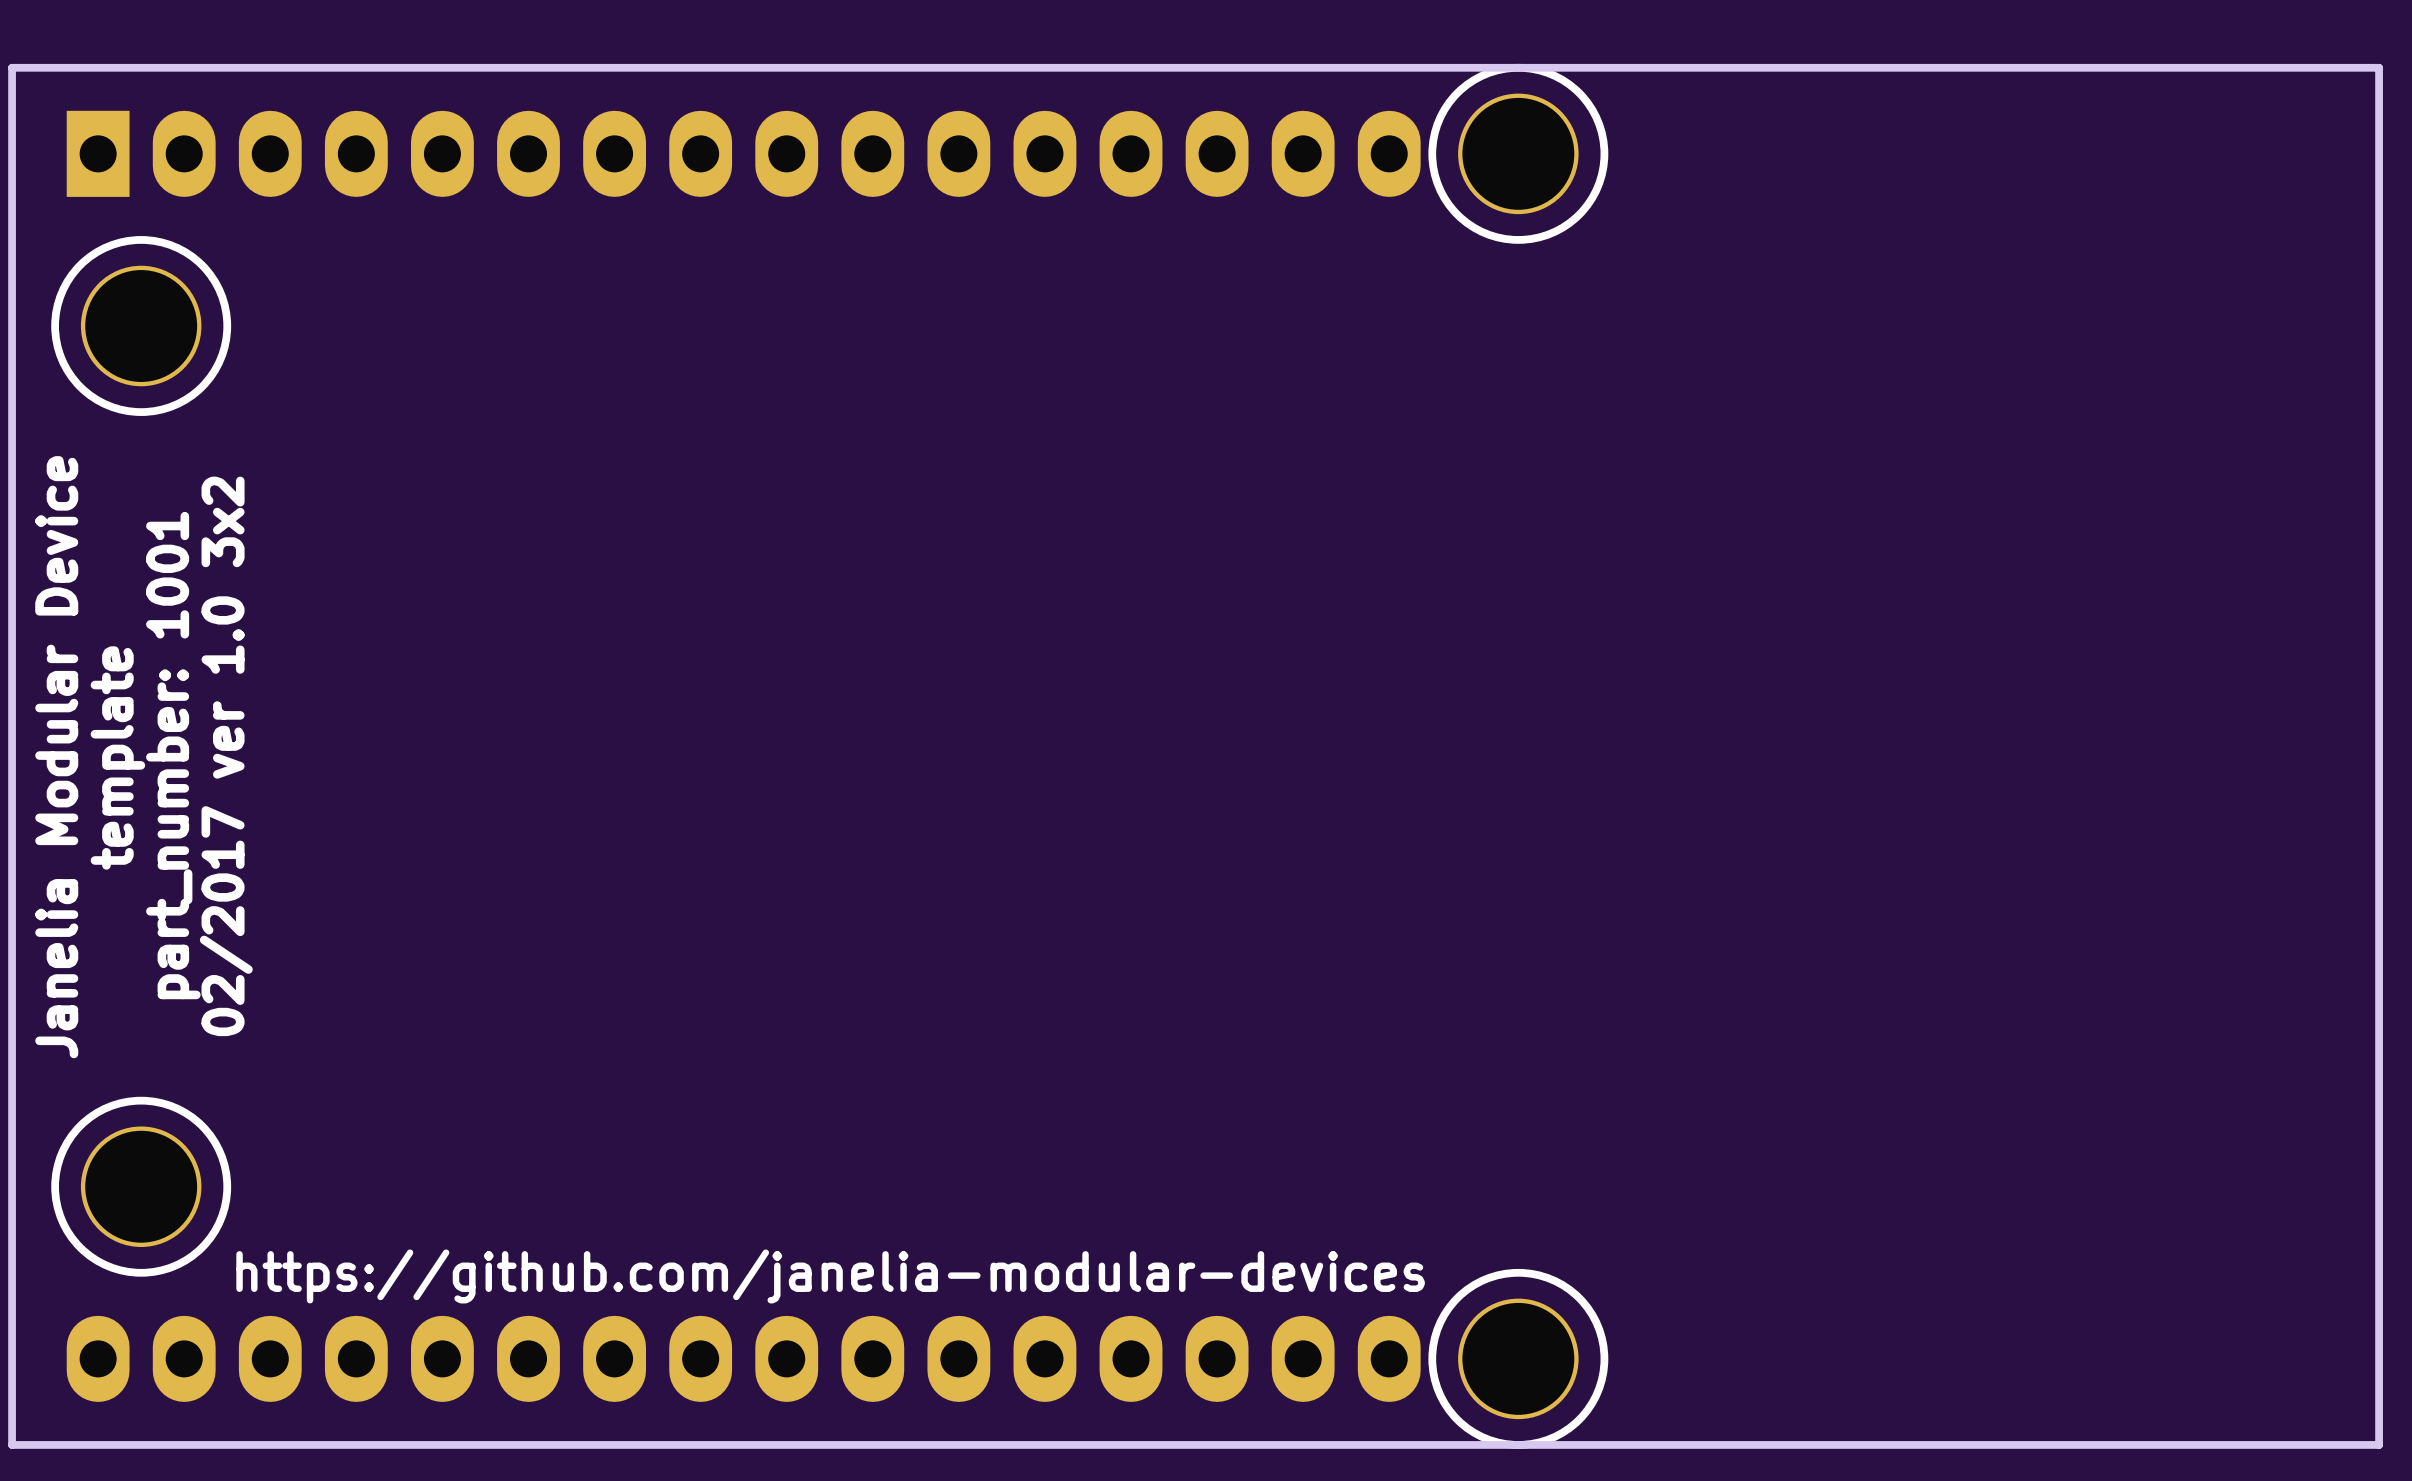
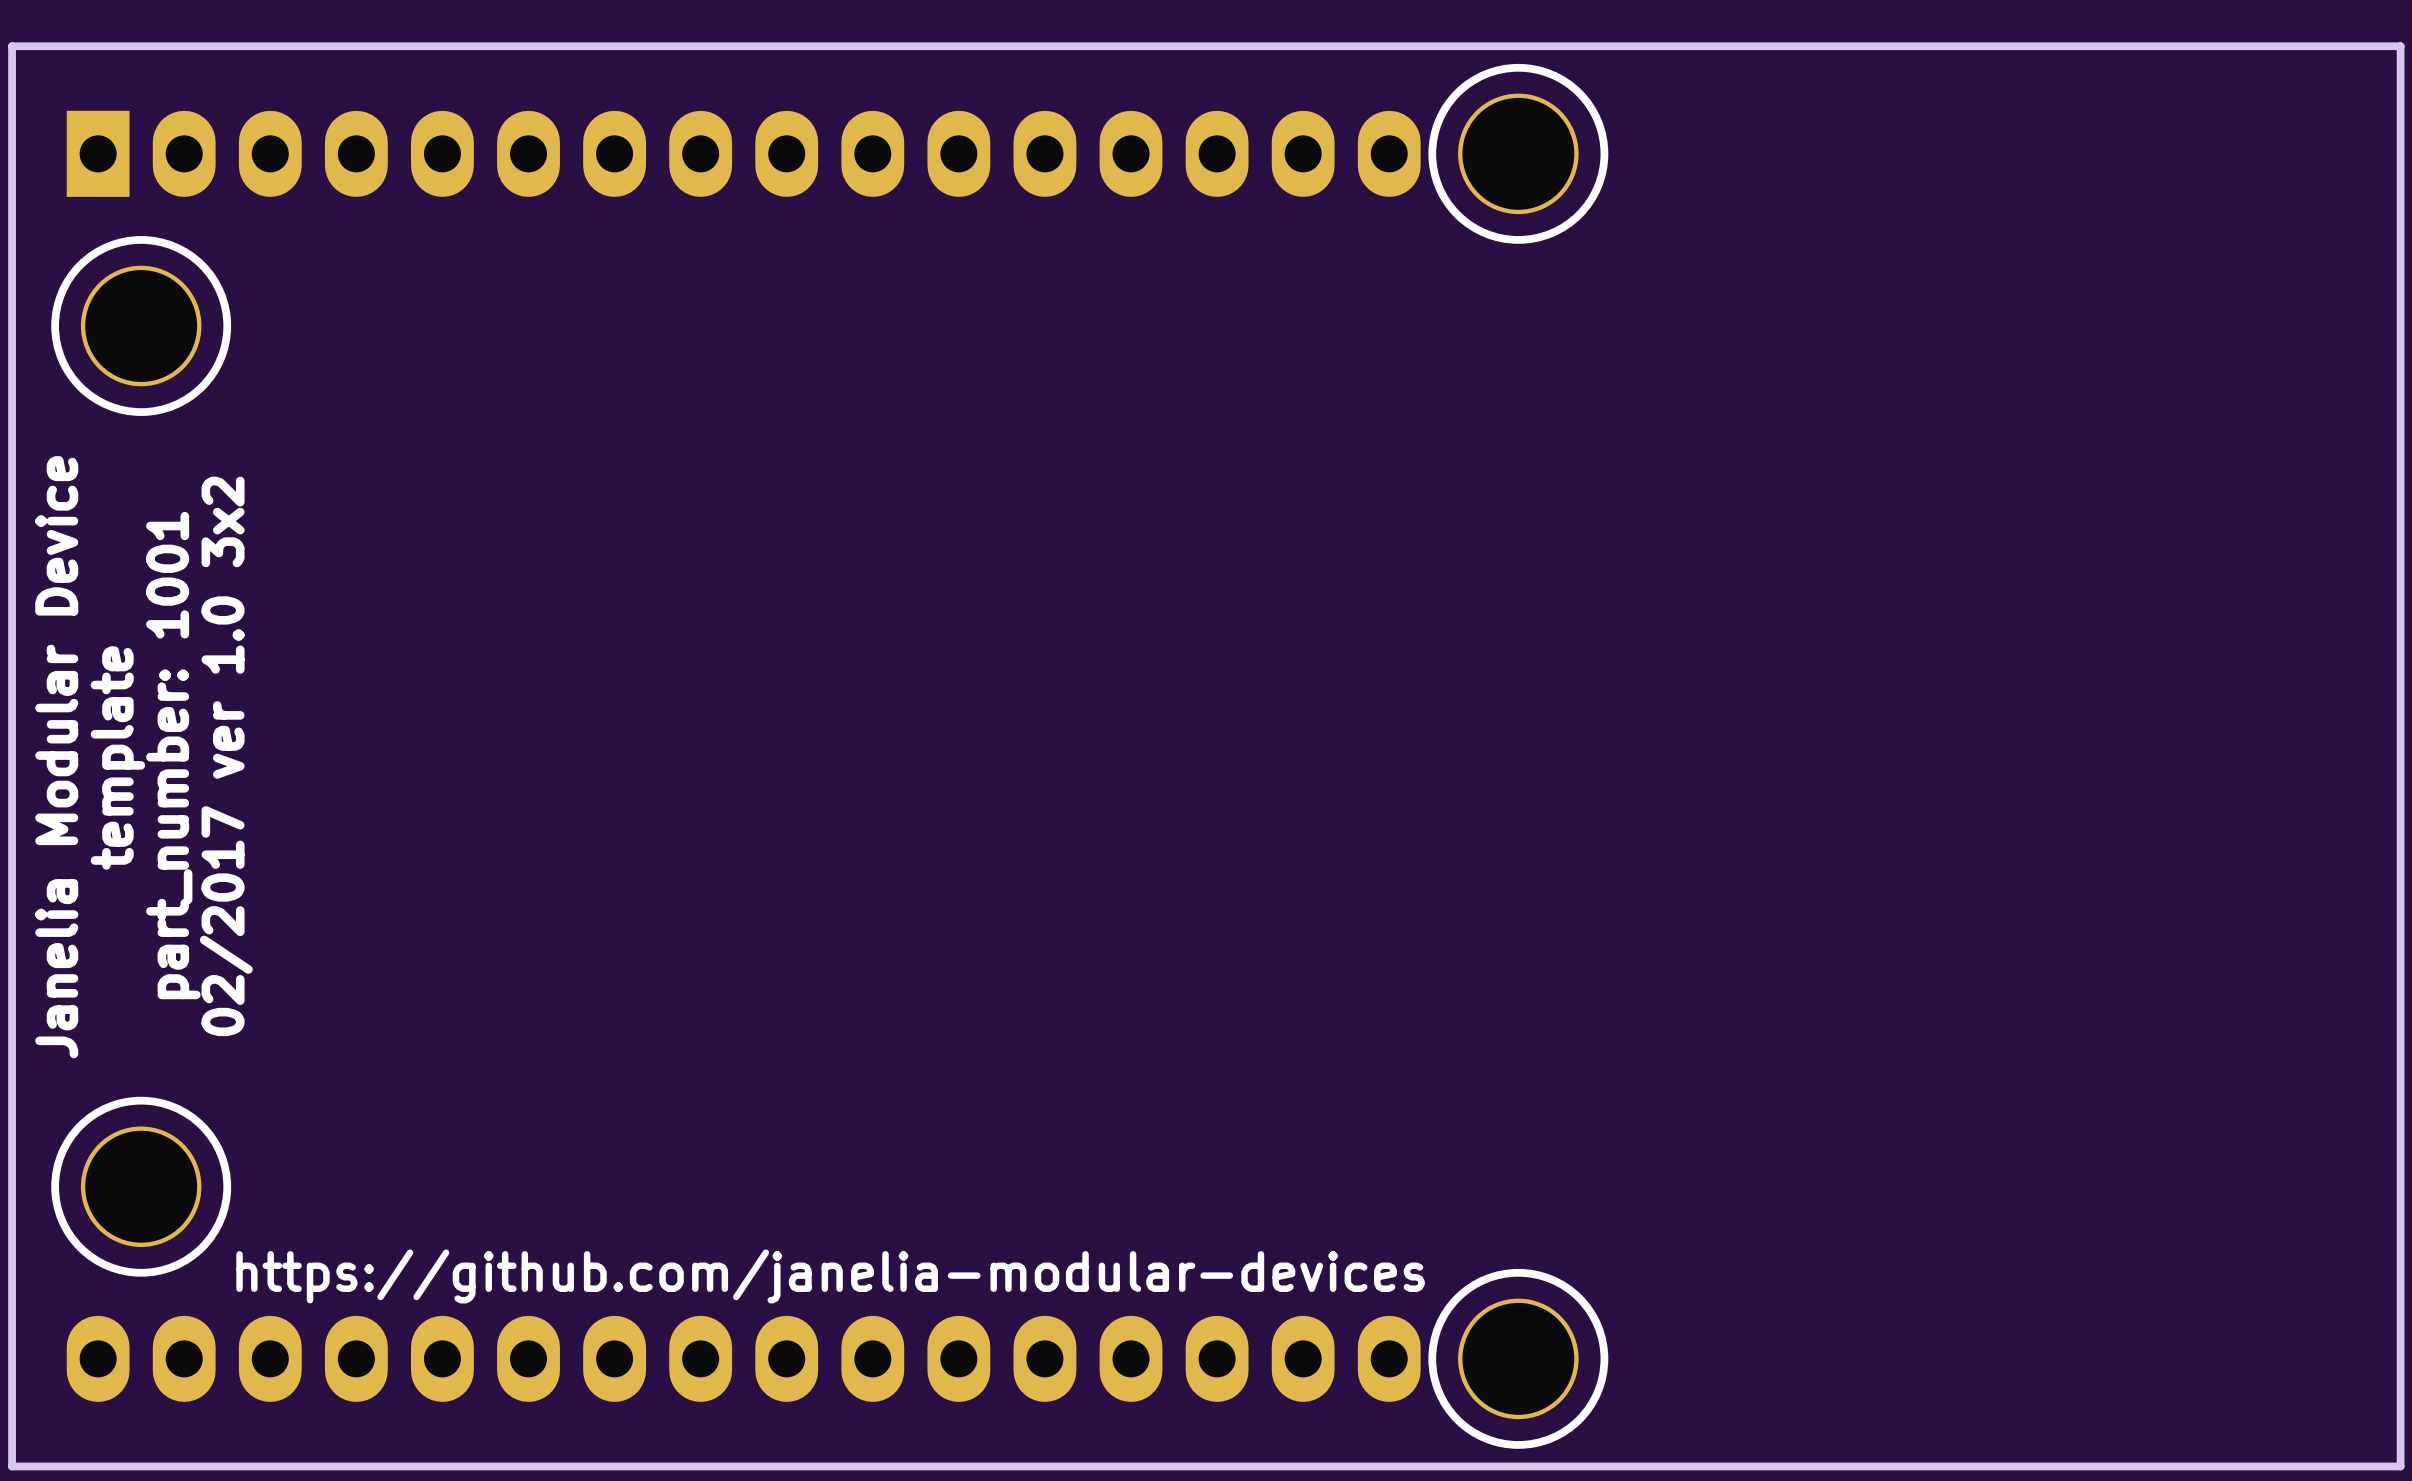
board edge: (12, 67) (2379, 67) (2379, 1444) (12, 1444) -> (12, 67) (12, 46) (2400, 46) (2400, 1466) (12, 1466) (12, 1444)

